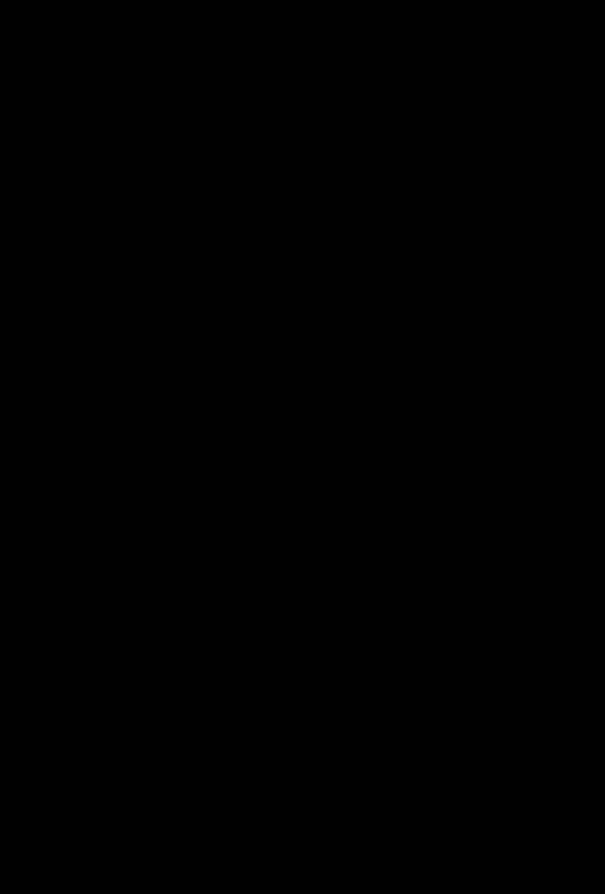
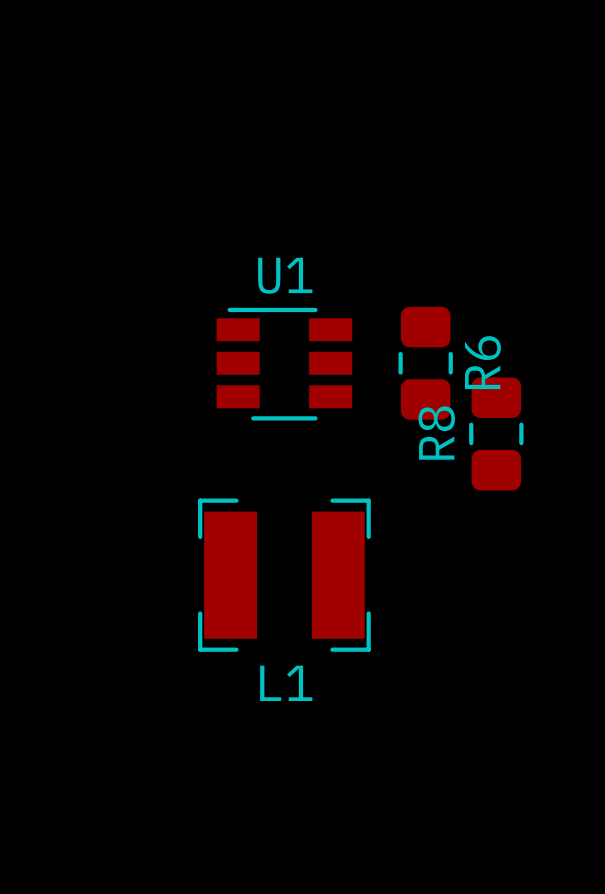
R6: none -> (425, 363)
U1: none -> (284, 364)
R8: none -> (496, 433)
L1: none -> (284, 575)

